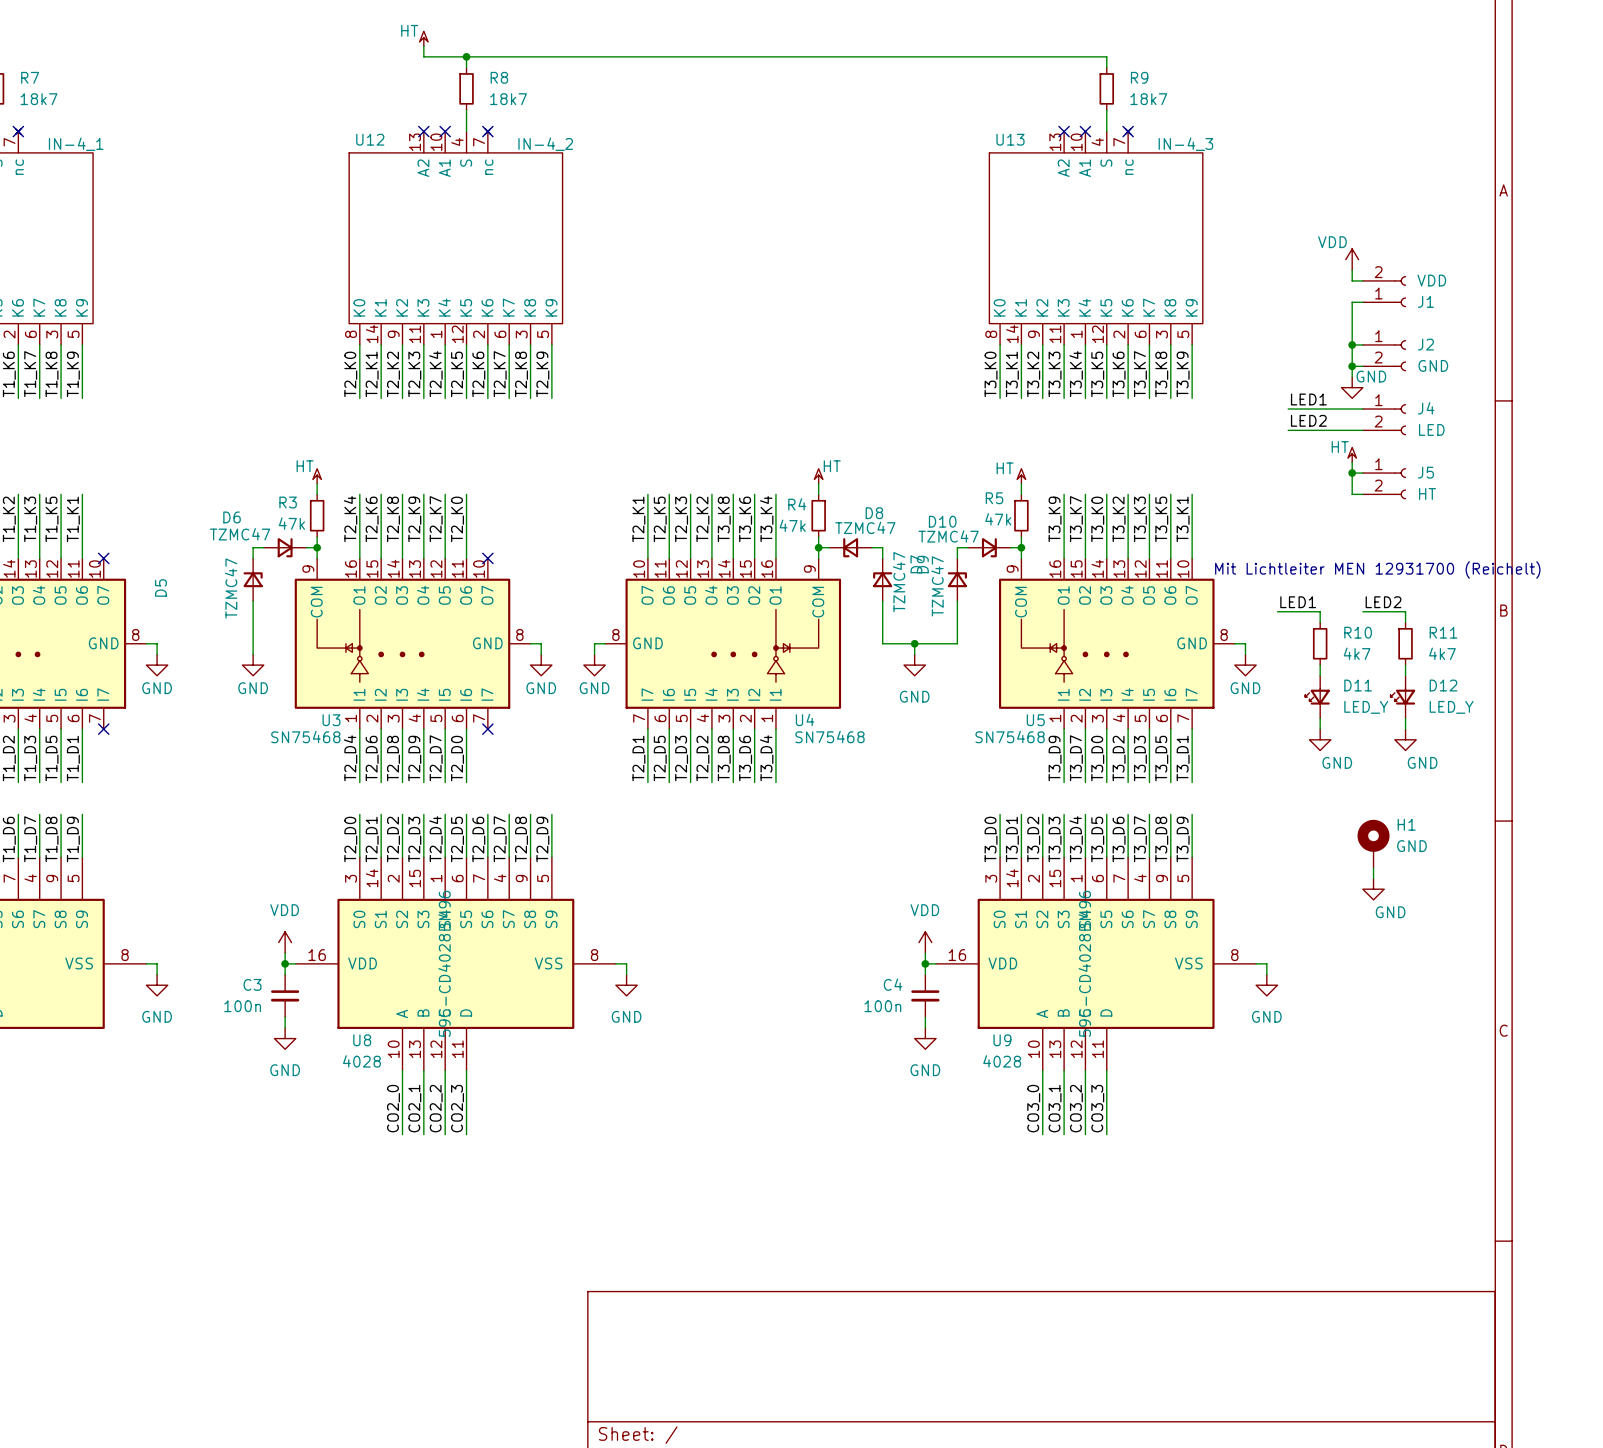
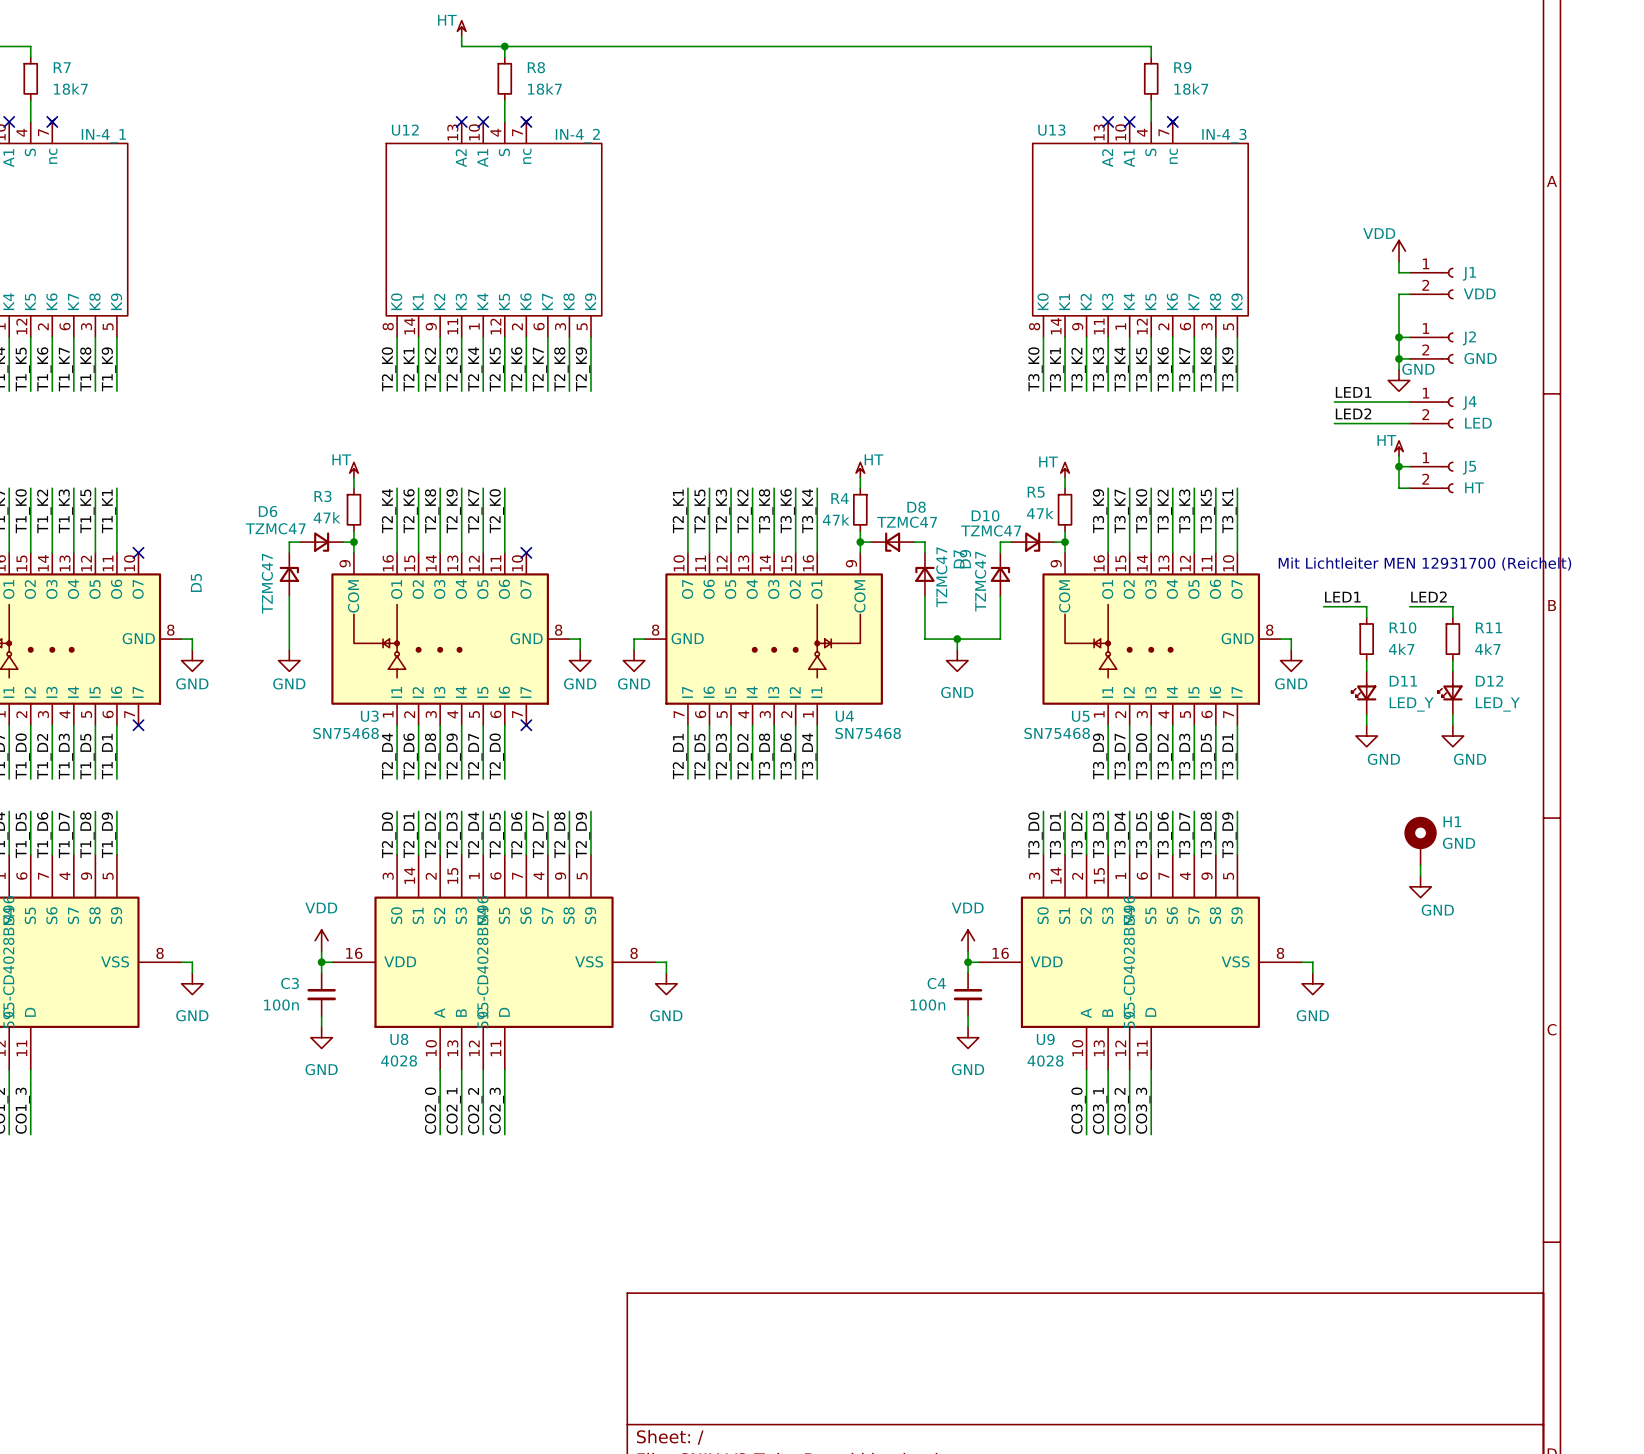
J1 flip: as is (1400, 291) -> up-down (1447, 283)

